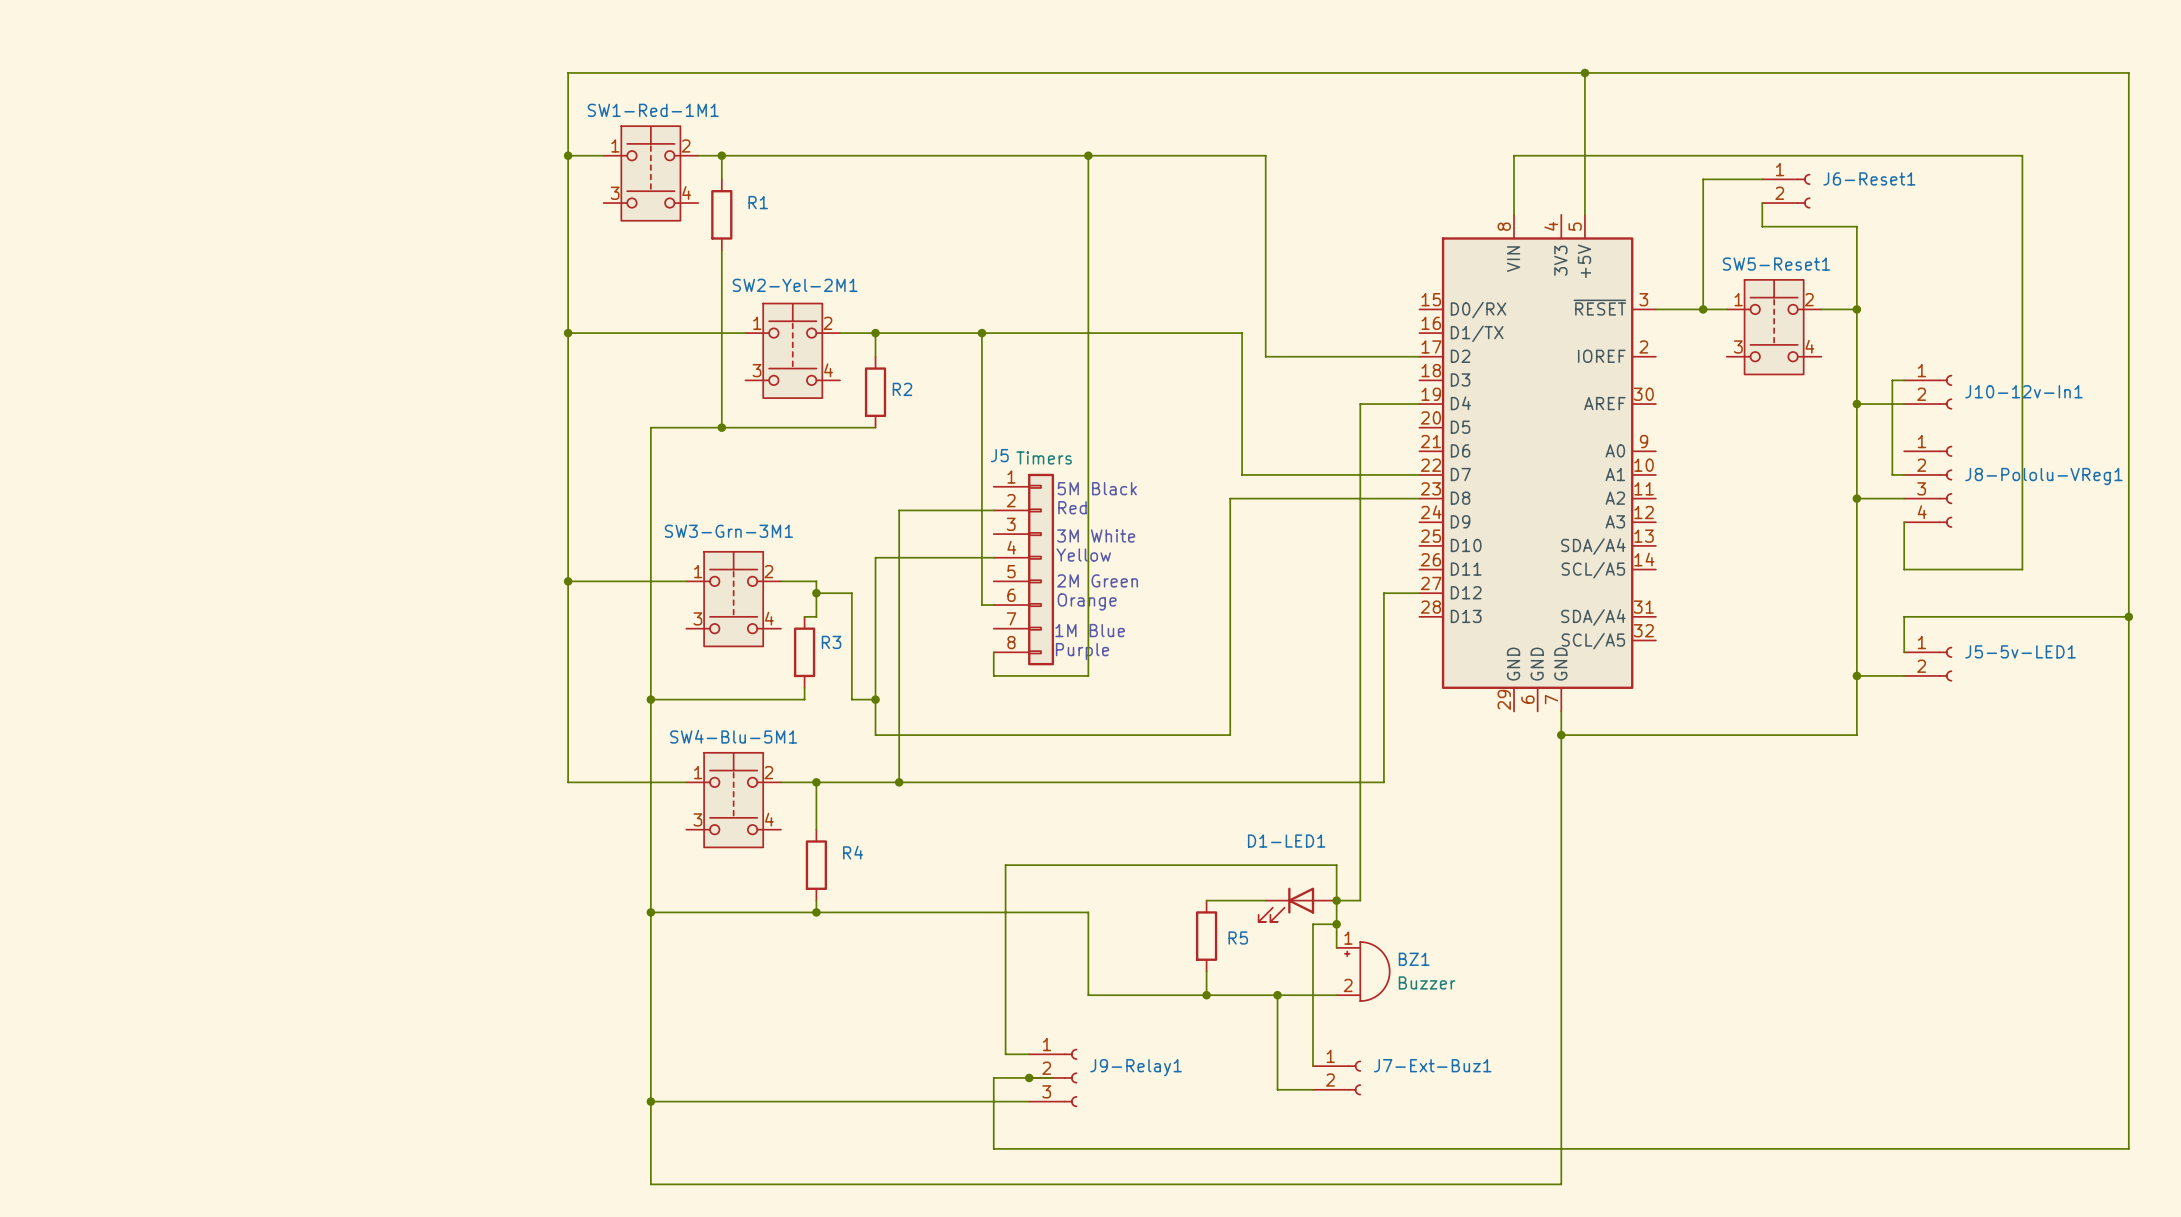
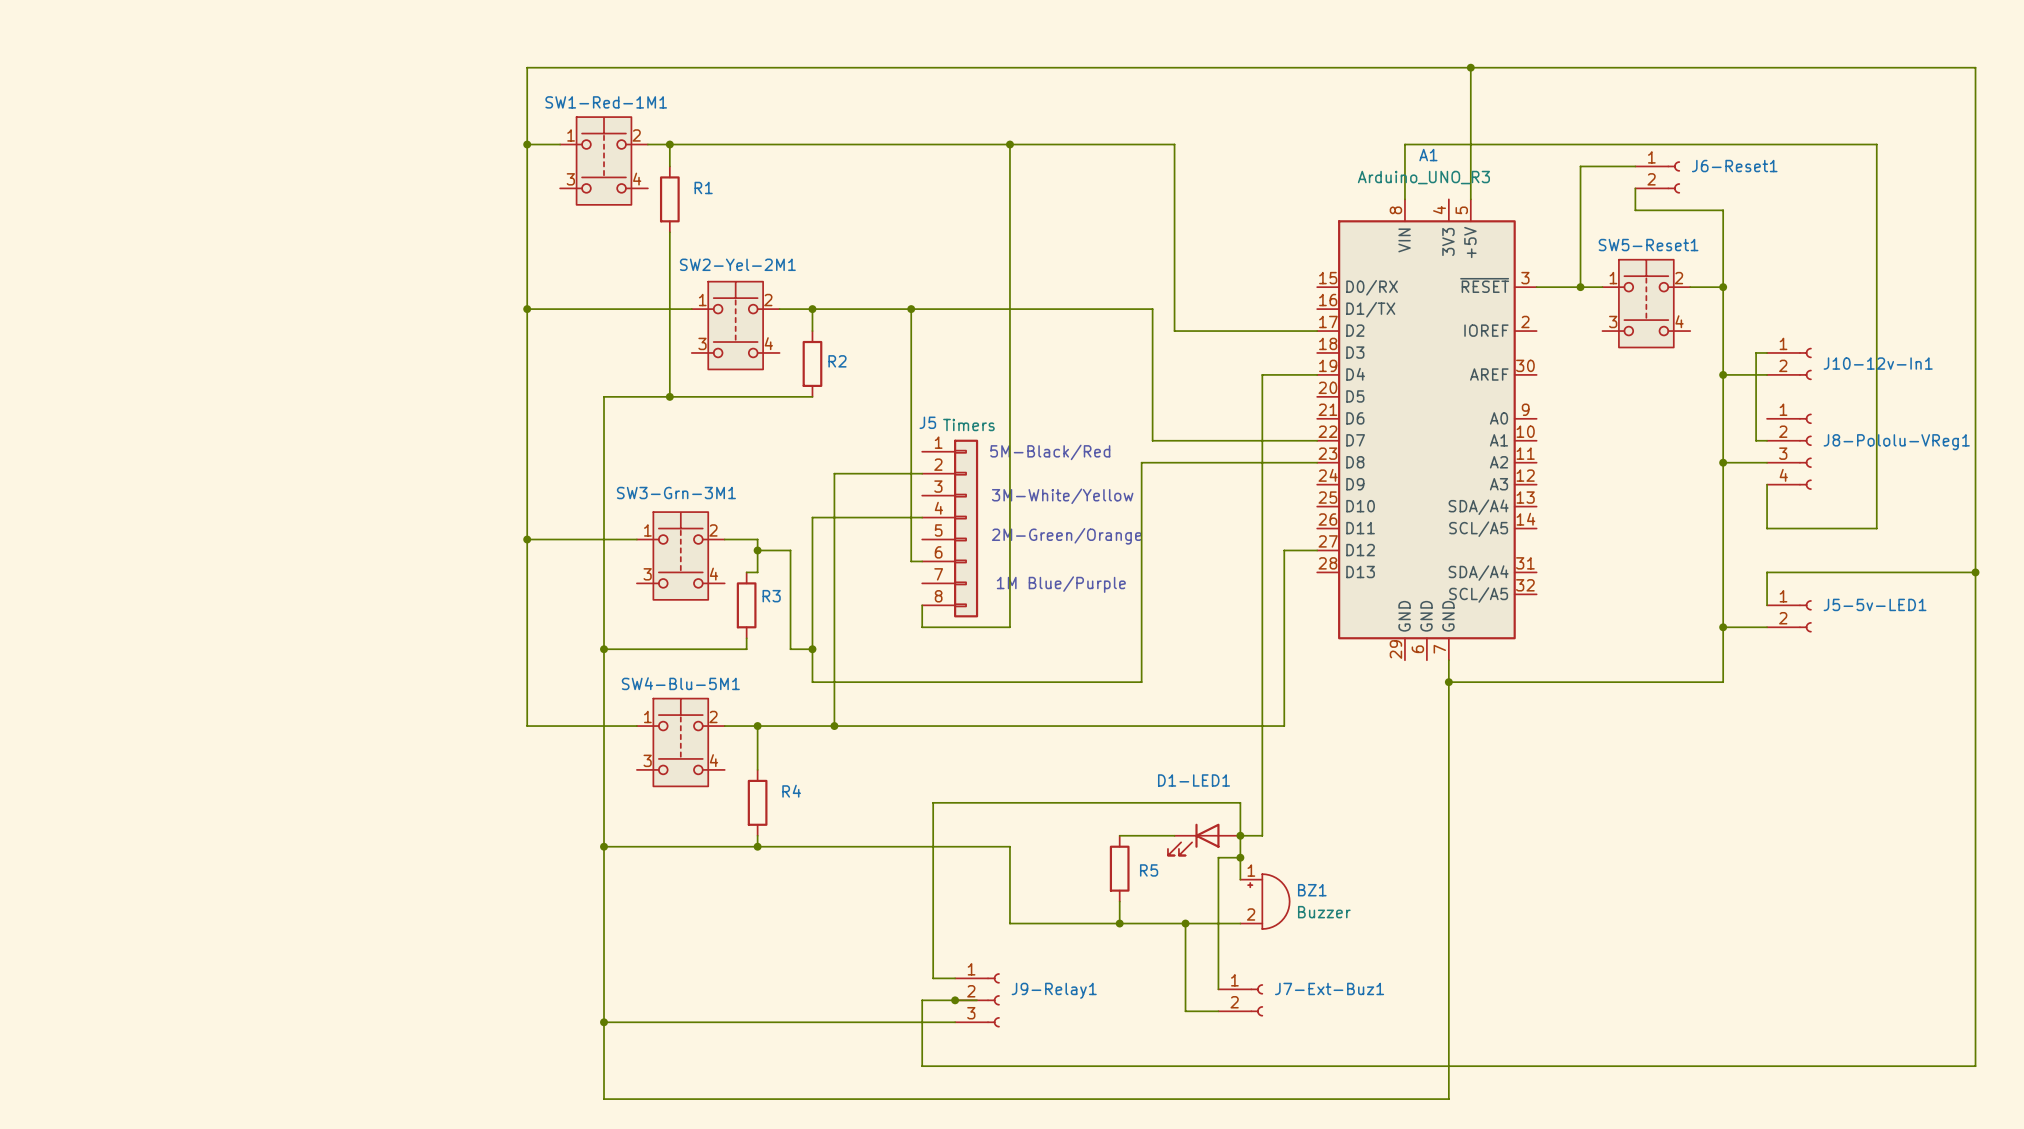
A1 name: none -> A1 (1428, 155)
A1 value: none -> Arduino_UNO_R3 (1423, 177)
text: 5M Black (1097, 488) -> 5M-Black/Red (1050, 452)
text: Red (1072, 507) -> none
text: 3M White (1096, 535) -> 3M-White/Yellow (1062, 496)
text: Yellow (1083, 555) -> none
text: 2M Green (1097, 580) -> 2M-Green/Orange (1066, 536)
text: Orange (1087, 601) -> none
text: 1M Blue (1090, 630) -> 1M Blue/Purple (1061, 584)
text: Purple (1082, 651) -> none

